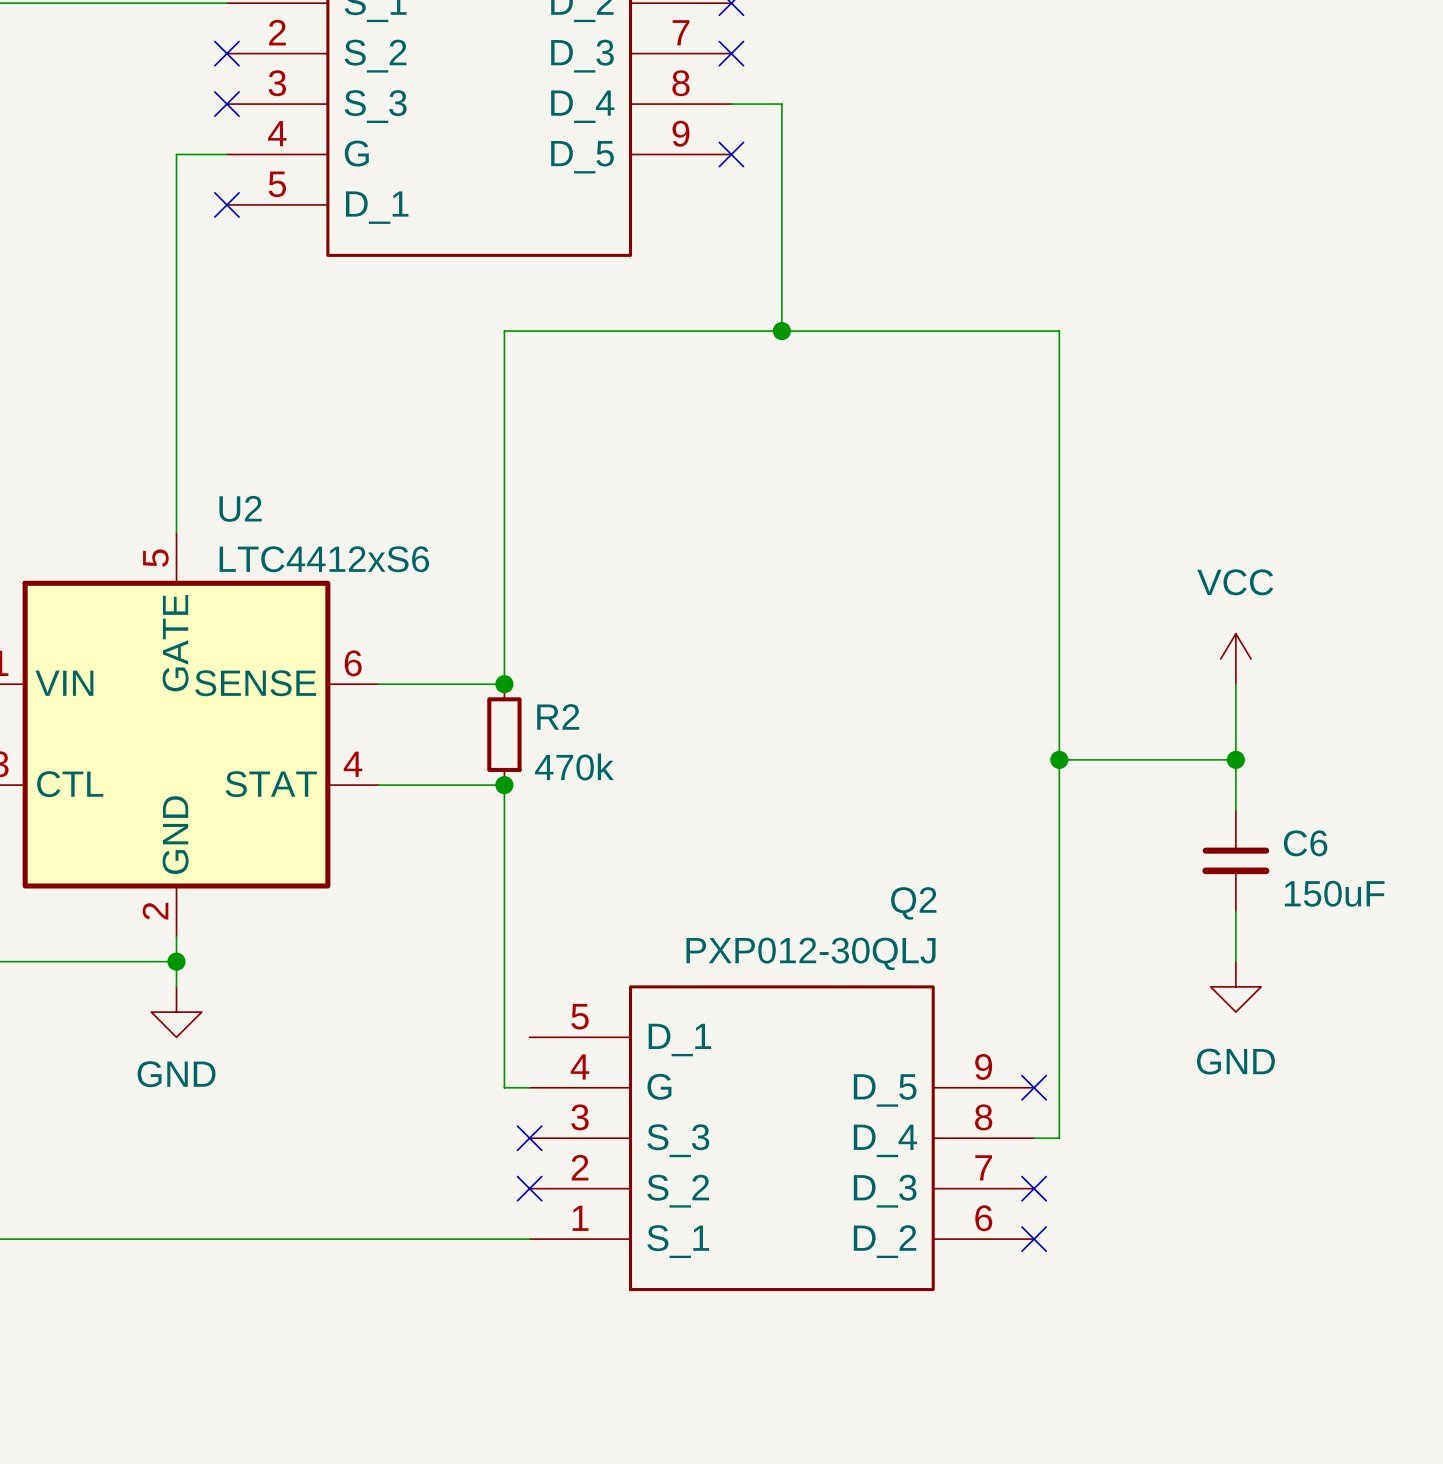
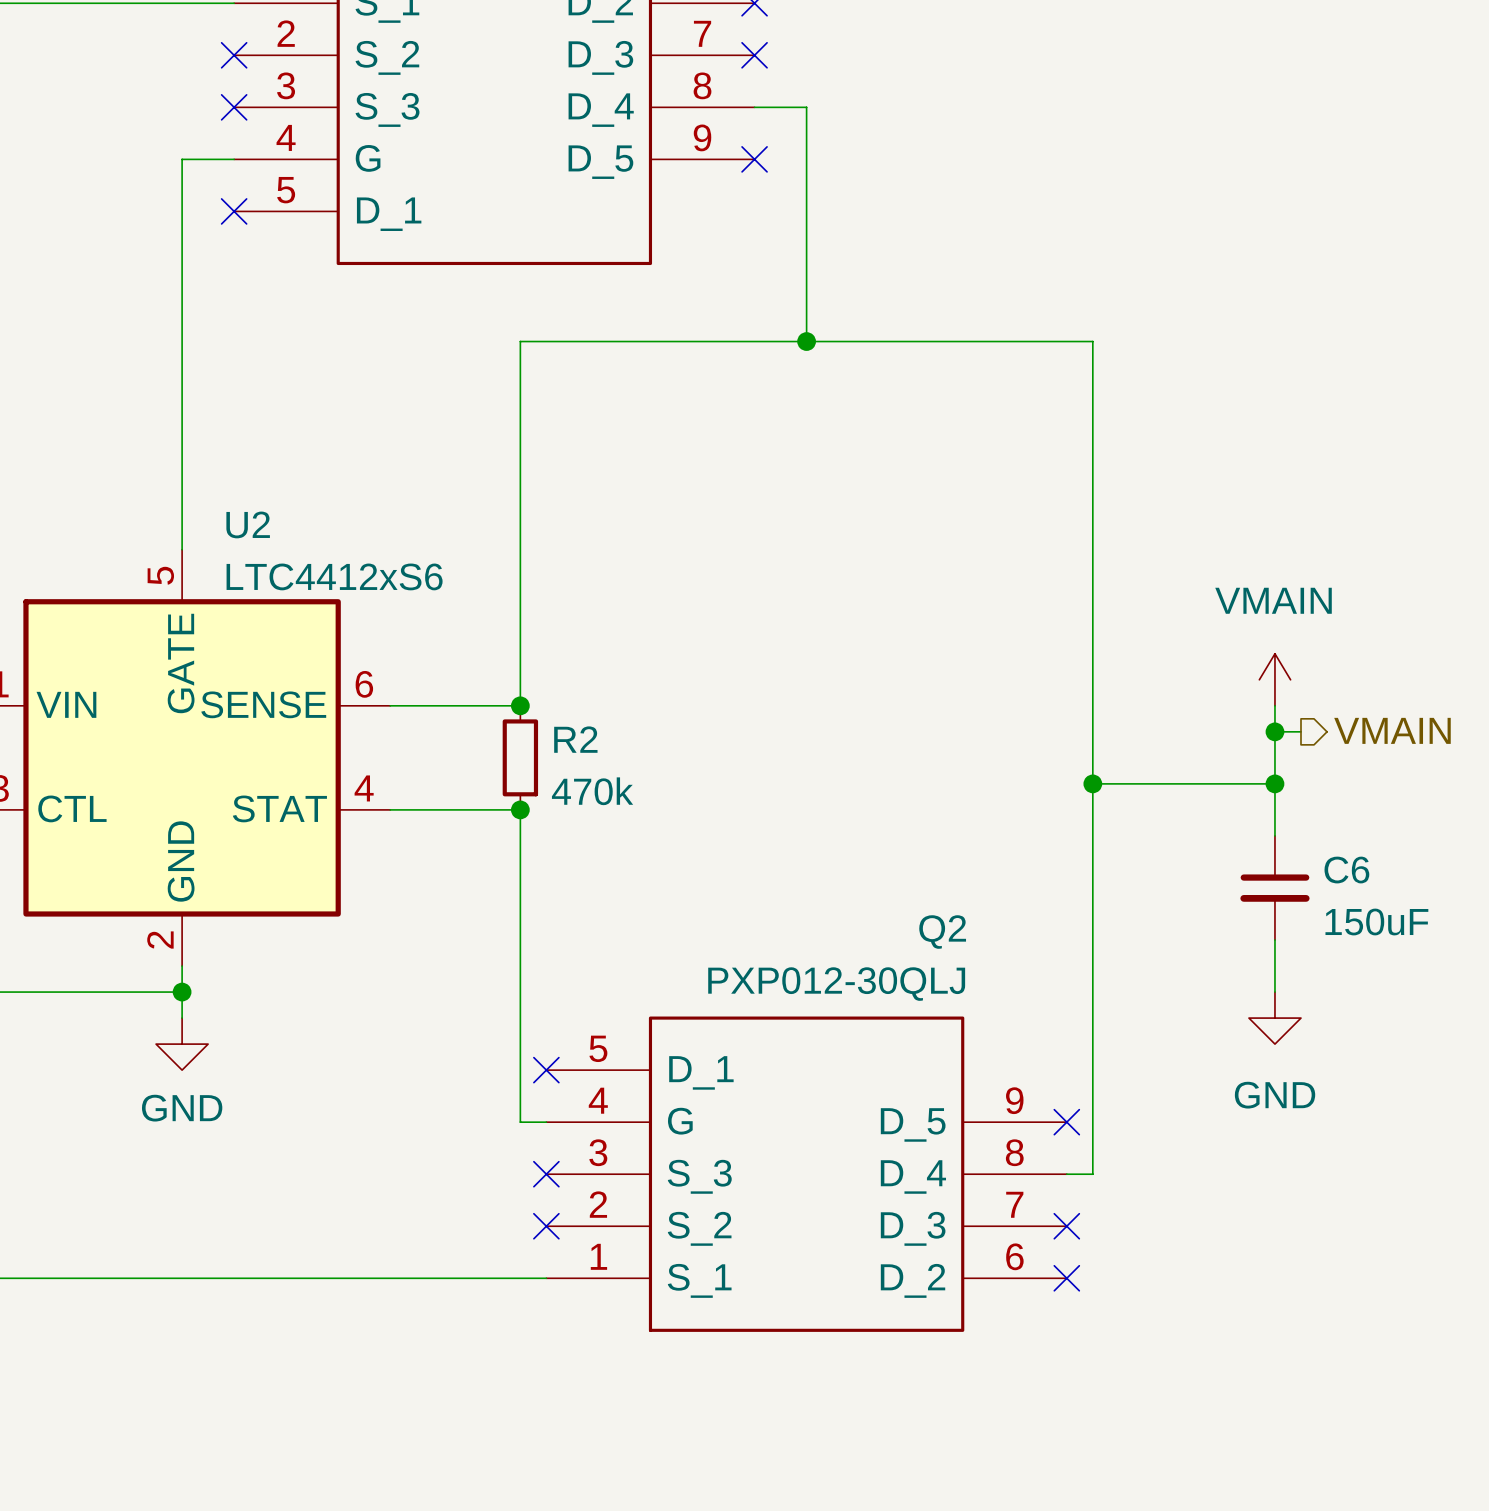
power symbol: VCC (1235, 658) -> VMAIN (1274, 679)
hierarchical label: none -> VMAIN (1392, 730)
wire: none -> (1274, 731) (1301, 731)
junction: none -> (1274, 731)
no-connect mark: none -> (546, 1070)

